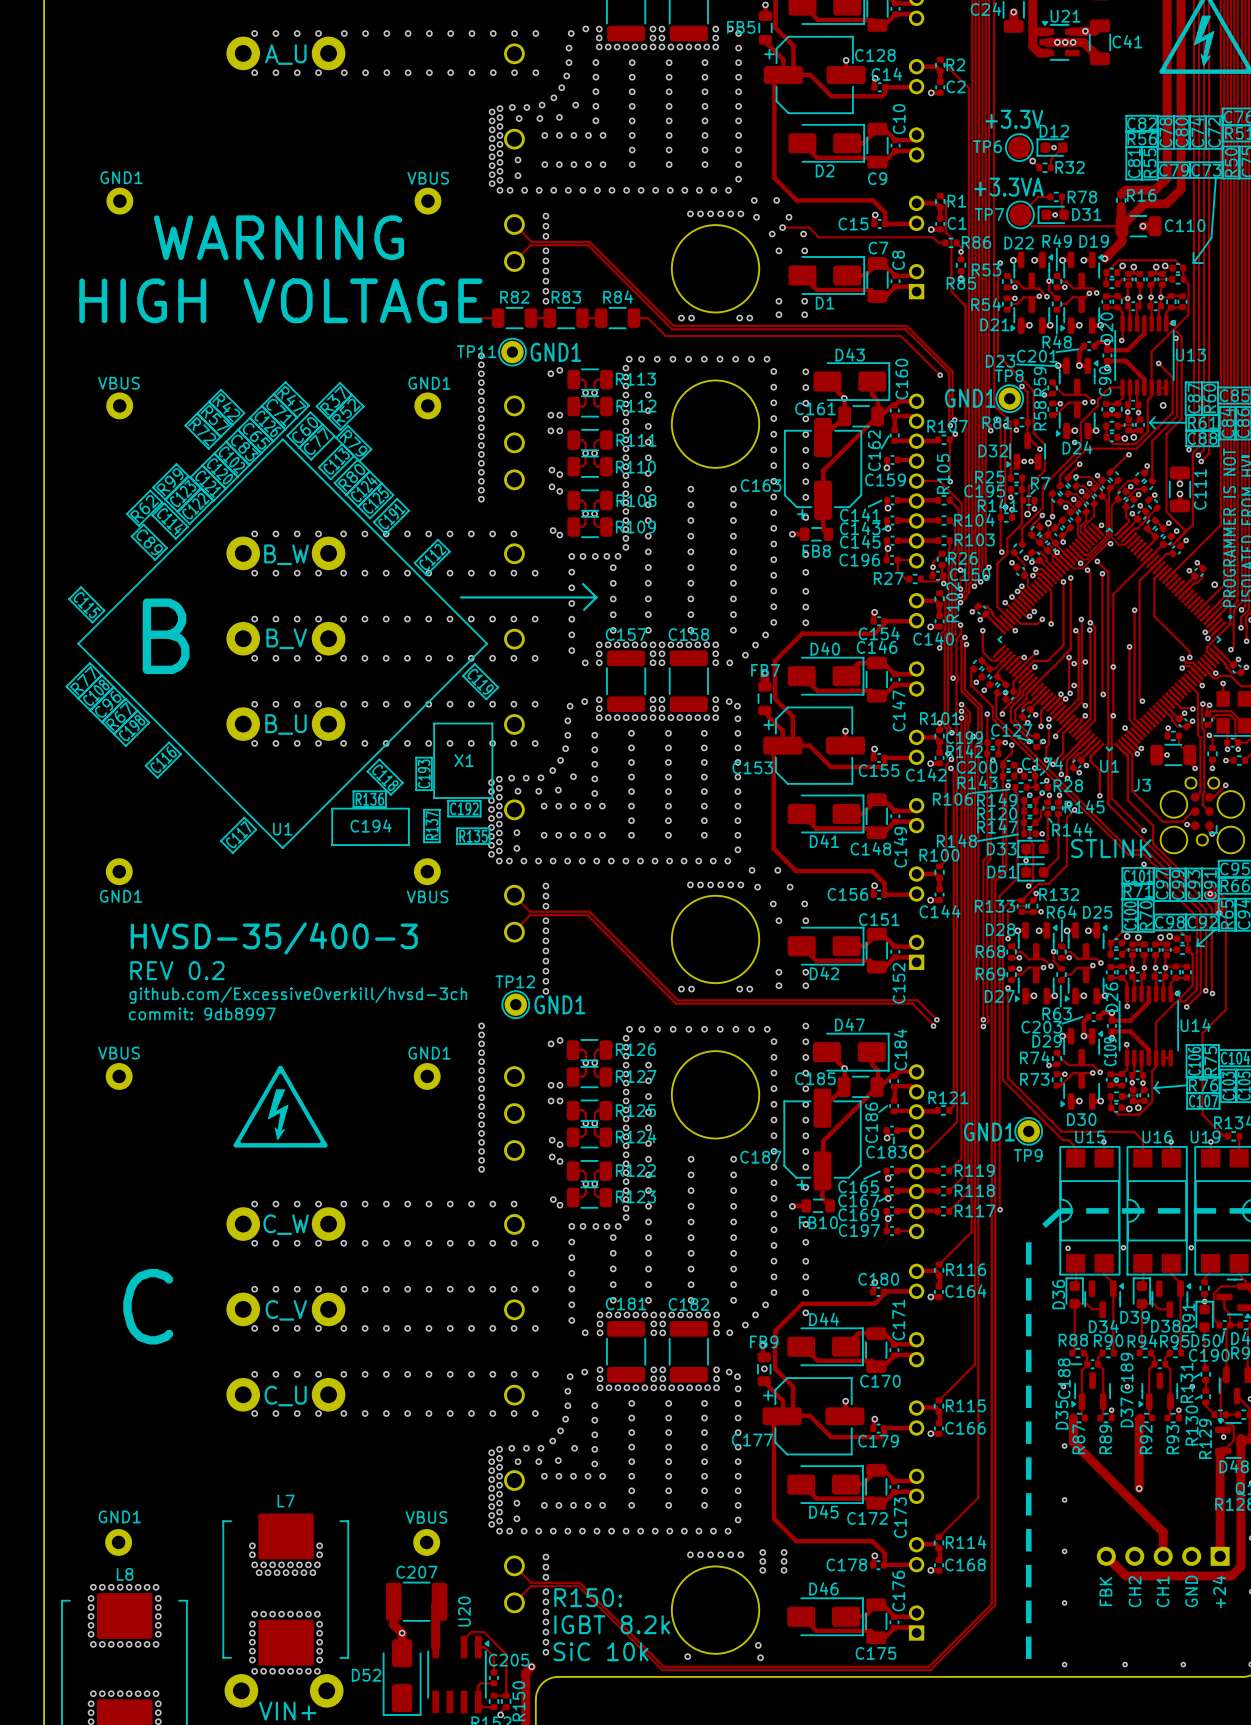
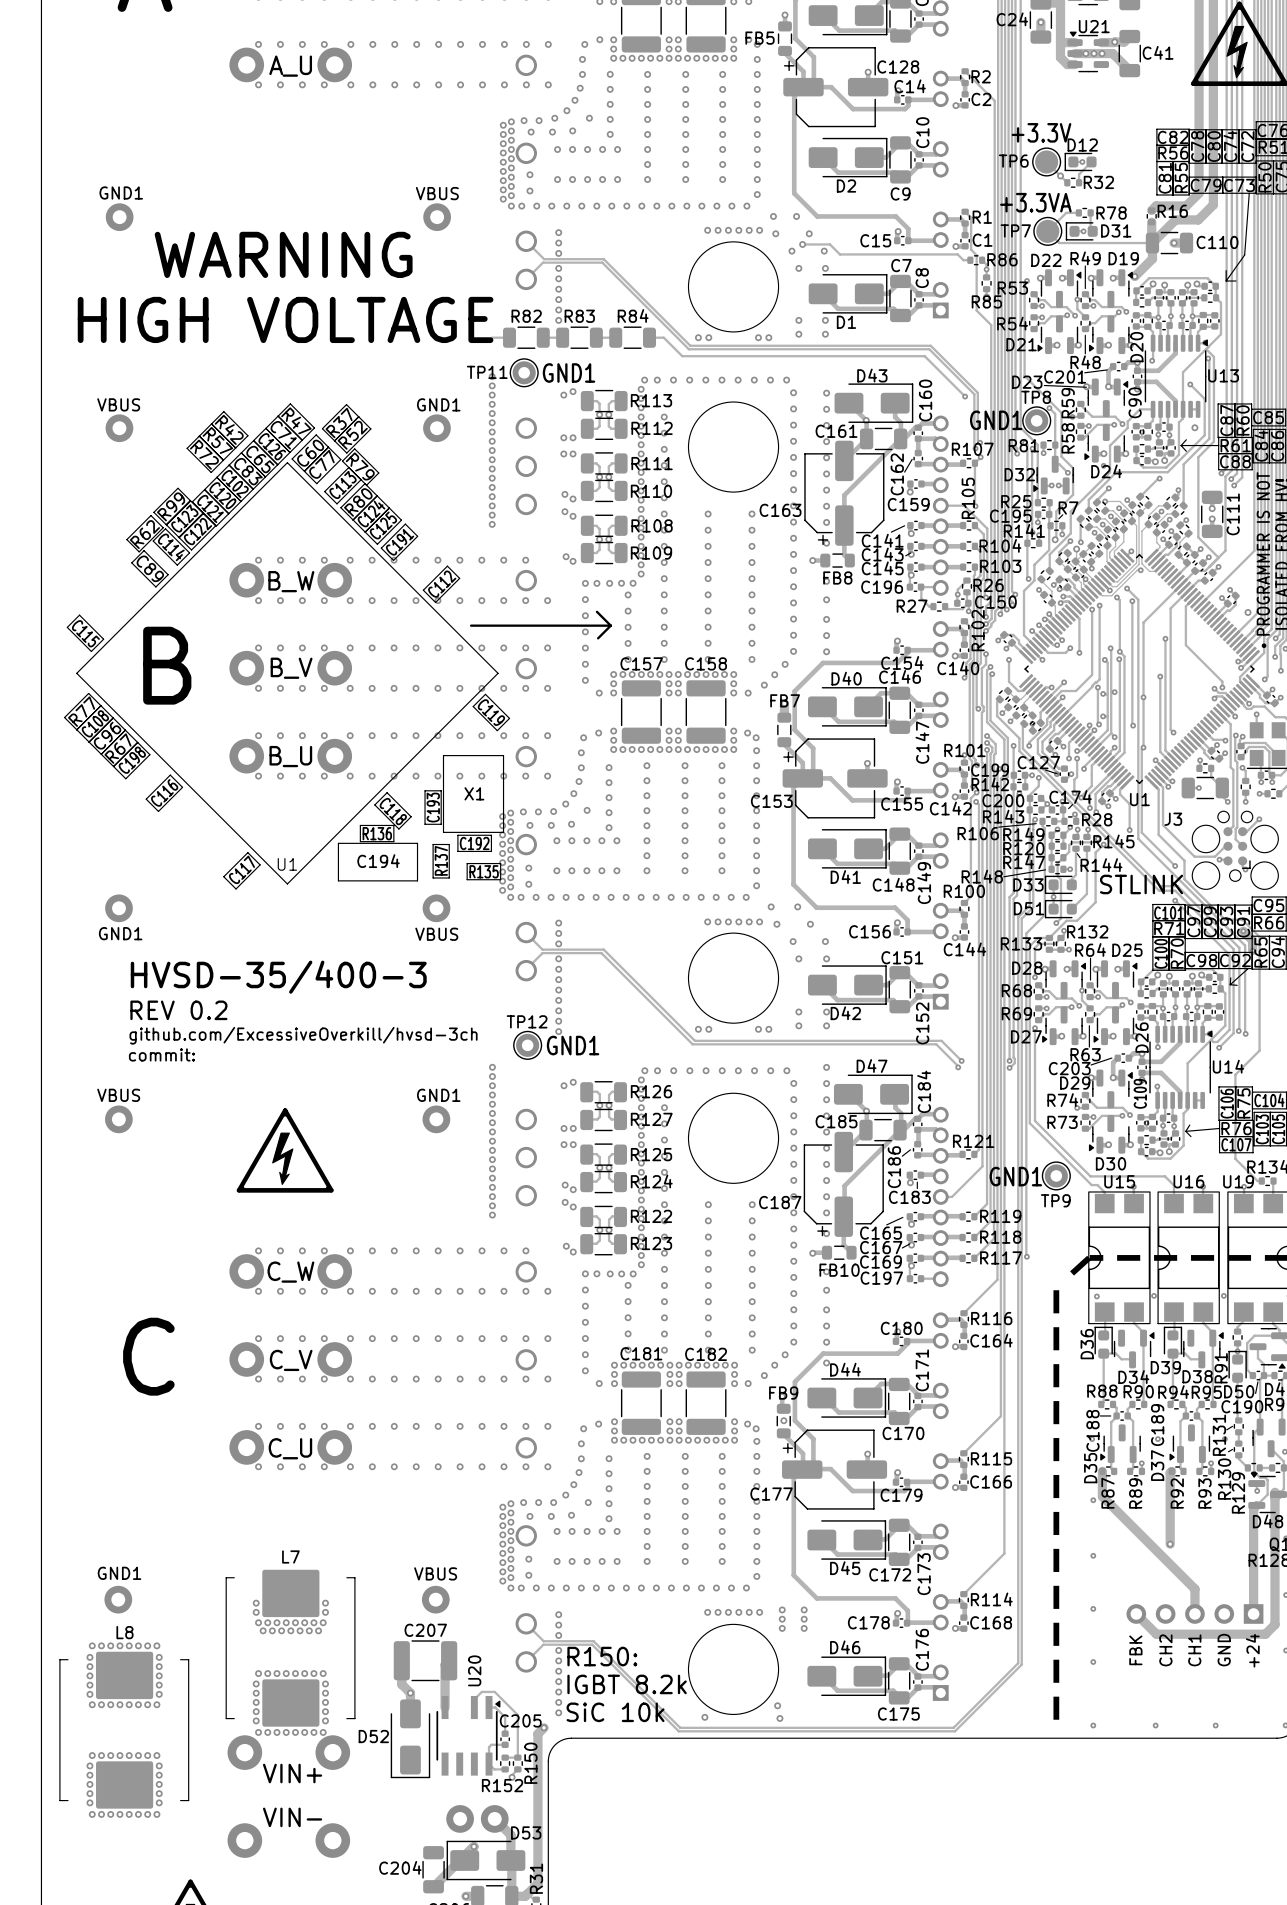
text: commit: 9db8997 (202, 1013) -> commit: (161, 1054)

